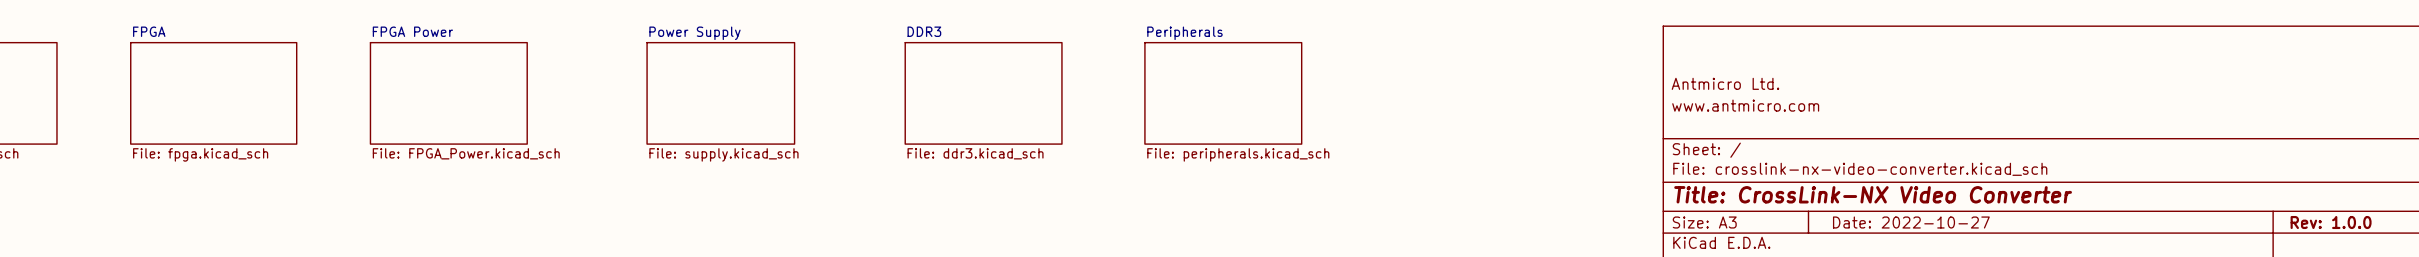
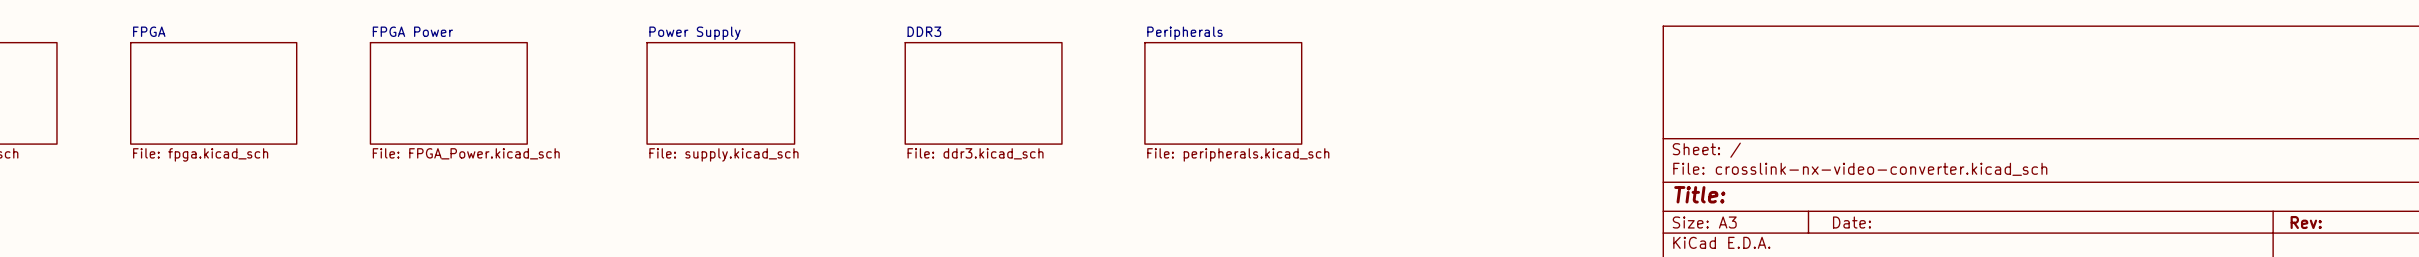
title block: Antmicro Ltd. (1725, 83) -> none
title block: www.antmicro.com (1745, 105) -> none
title block: Title: CrossLink-NX Video Converter (1873, 194) -> Title: (1699, 194)
title block: Date: 2022-10-27 (1911, 222) -> Date: (1852, 222)
title block: Rev: 1.0.0 (2331, 222) -> Rev: (2306, 222)

